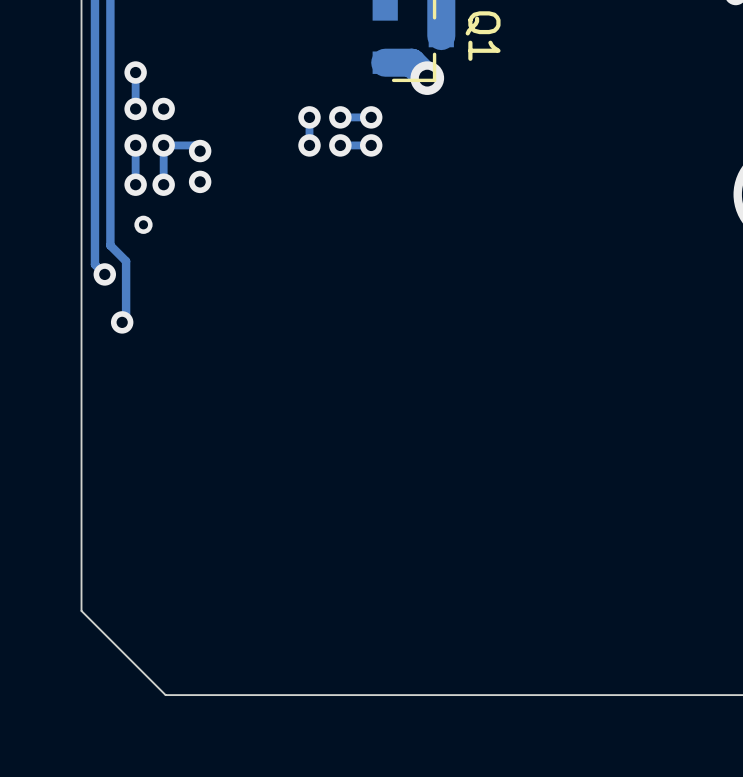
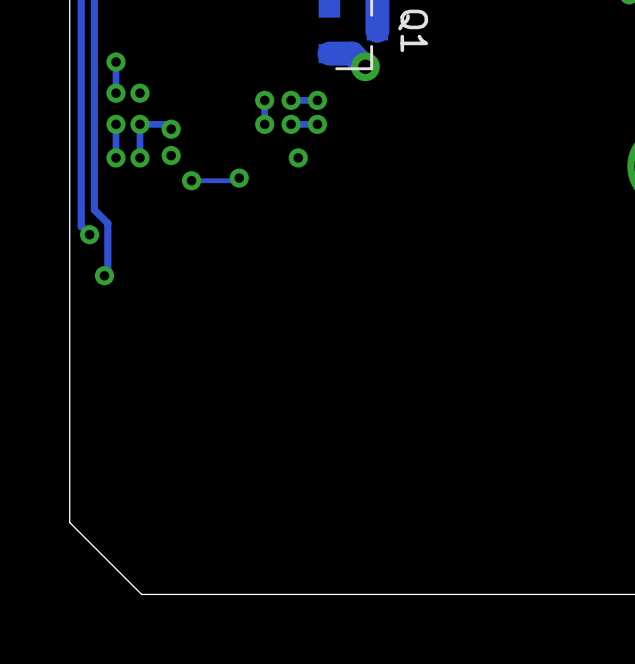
via: none -> (298, 157)
track: none -> (239, 178) (236, 180) (191, 180)
via: none -> (239, 178)
via: none -> (191, 180)
via: (143, 224) -> none

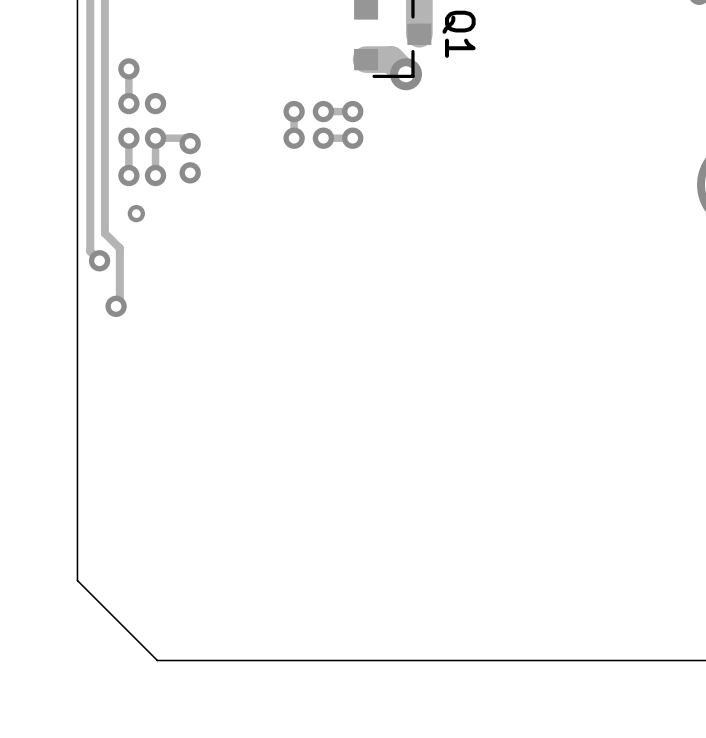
via: (298, 157) -> none
track: (239, 178) (236, 180) (191, 180) -> none
via: (239, 178) -> none
via: (191, 180) -> none
via: none -> (136, 213)

